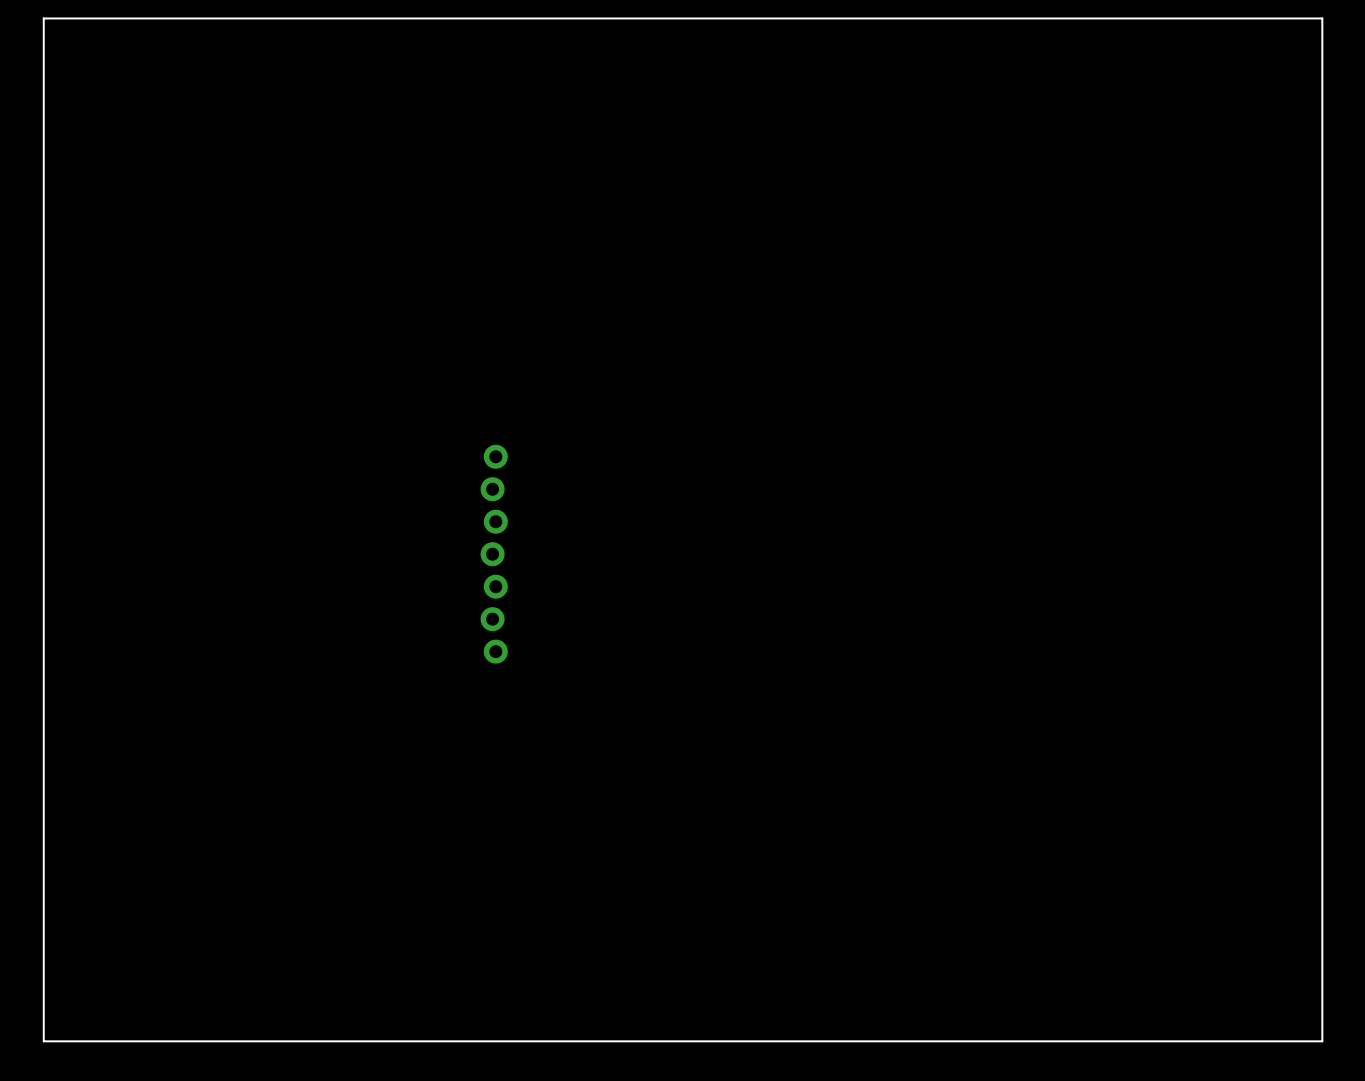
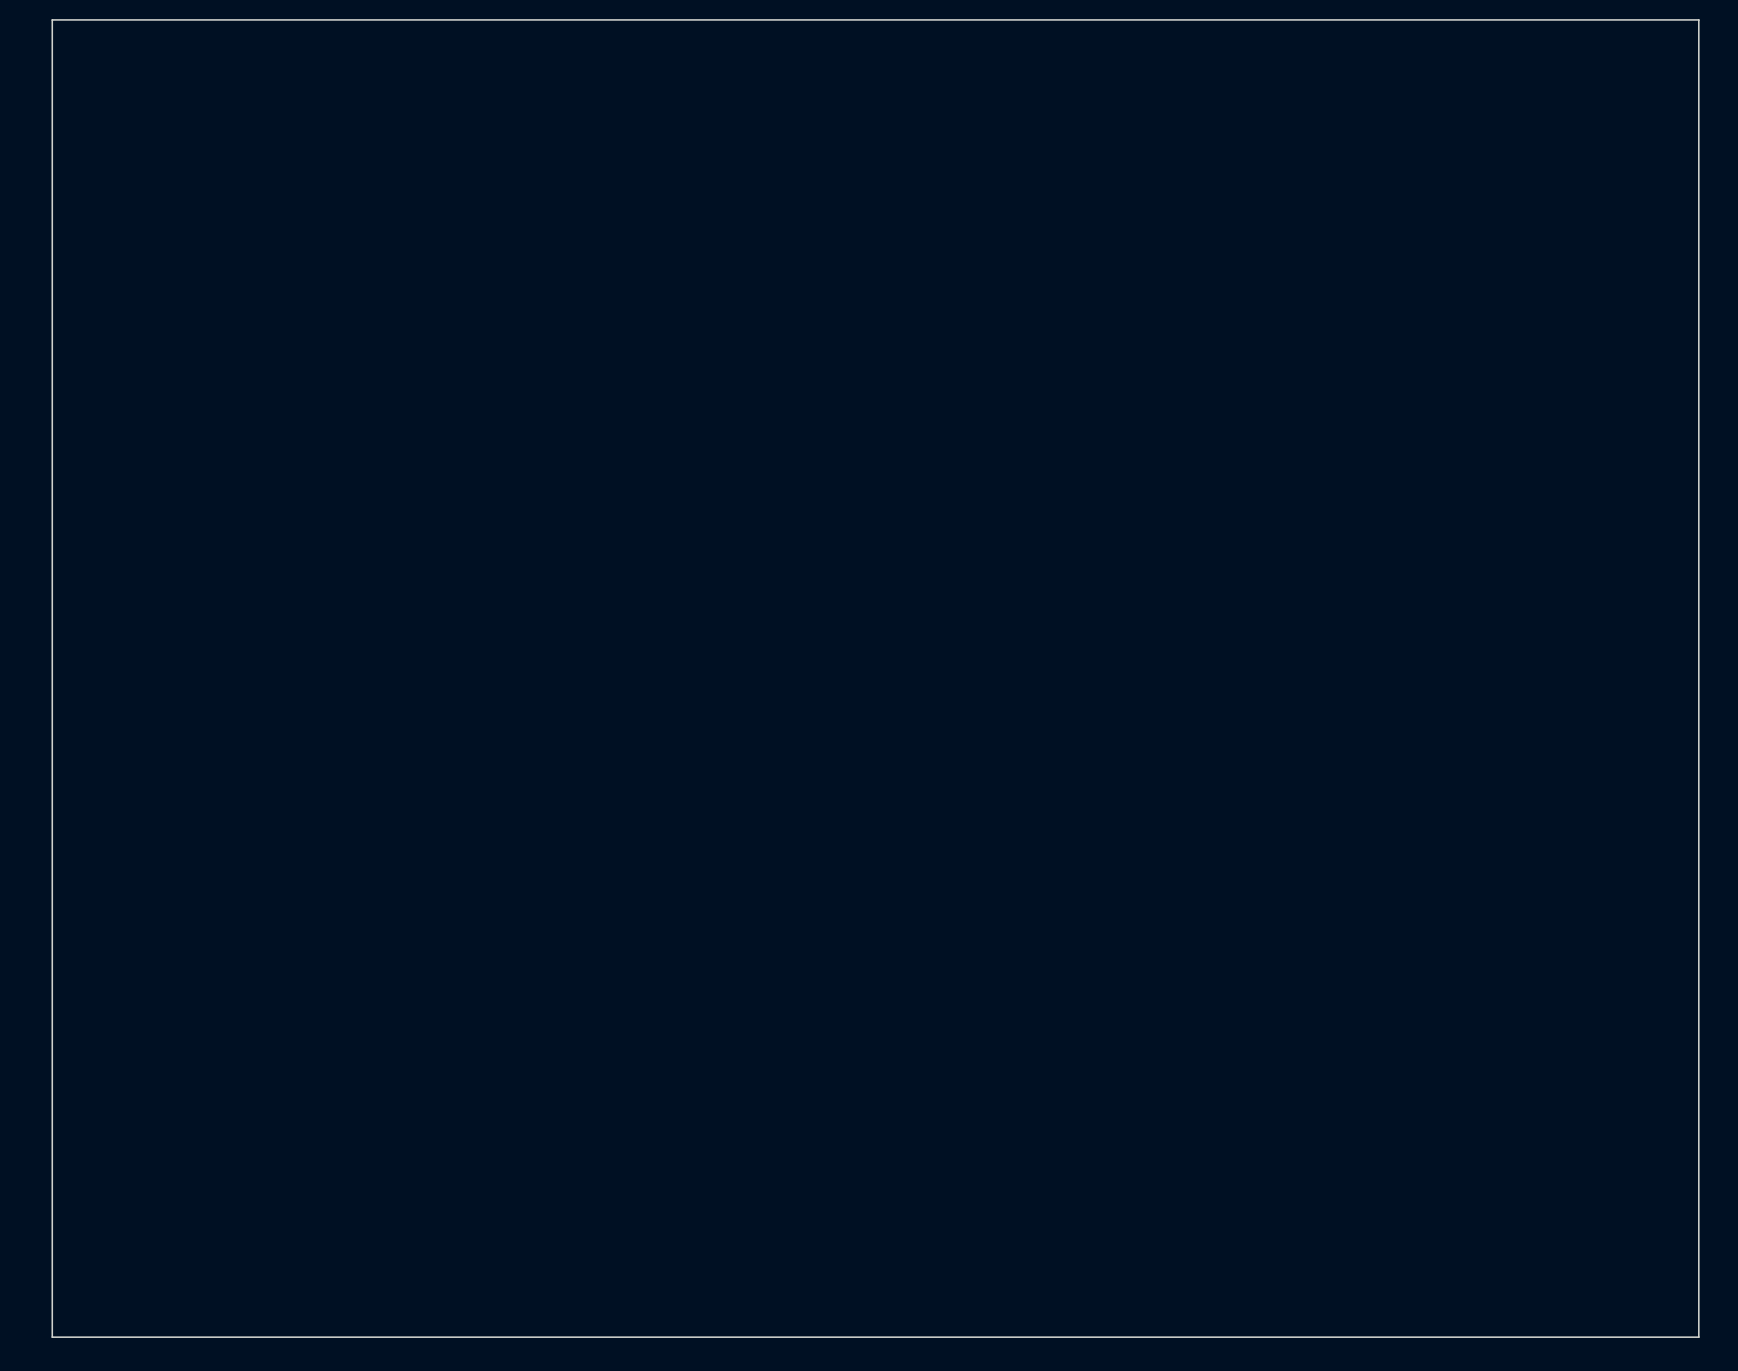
part: (494, 554) -> none

